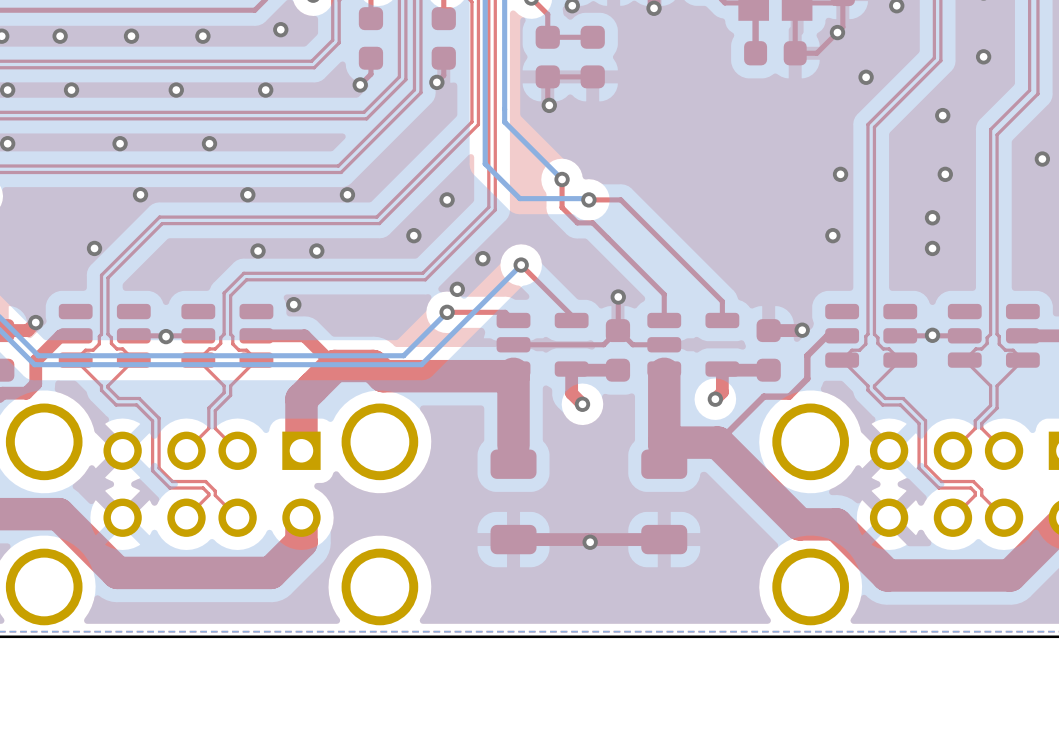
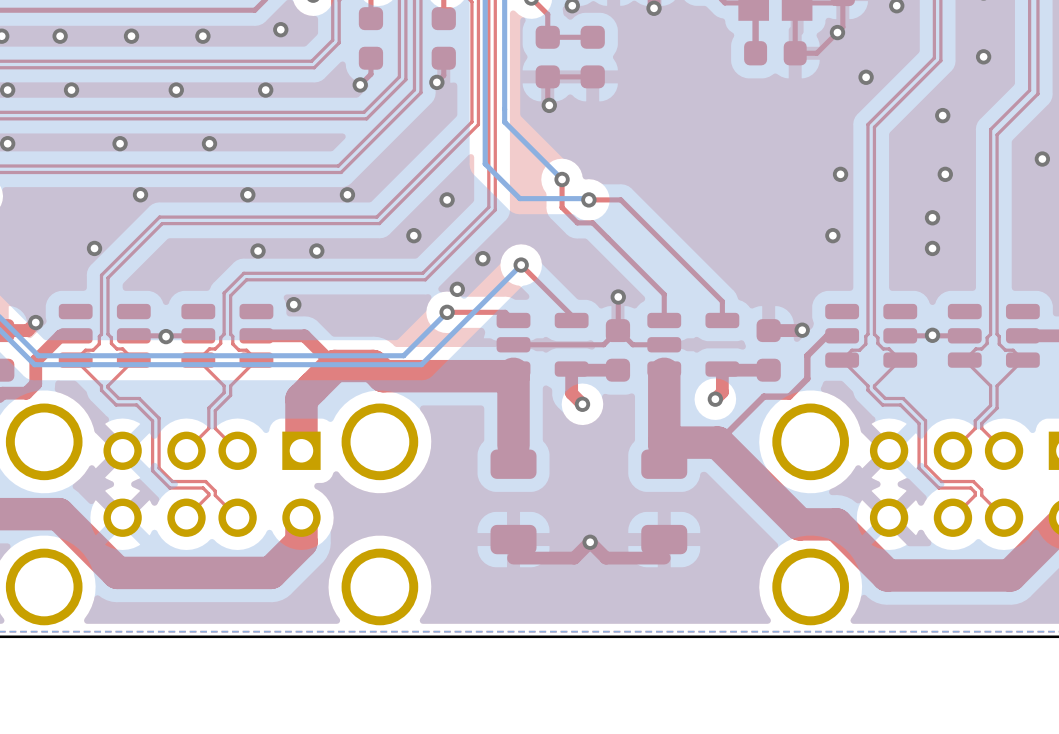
top track: (664, 539) (592, 539) (590, 542) (587, 539) (513, 539) -> none
top track: none -> (664, 558) (606, 558) (590, 542) (574, 558) (513, 558)

